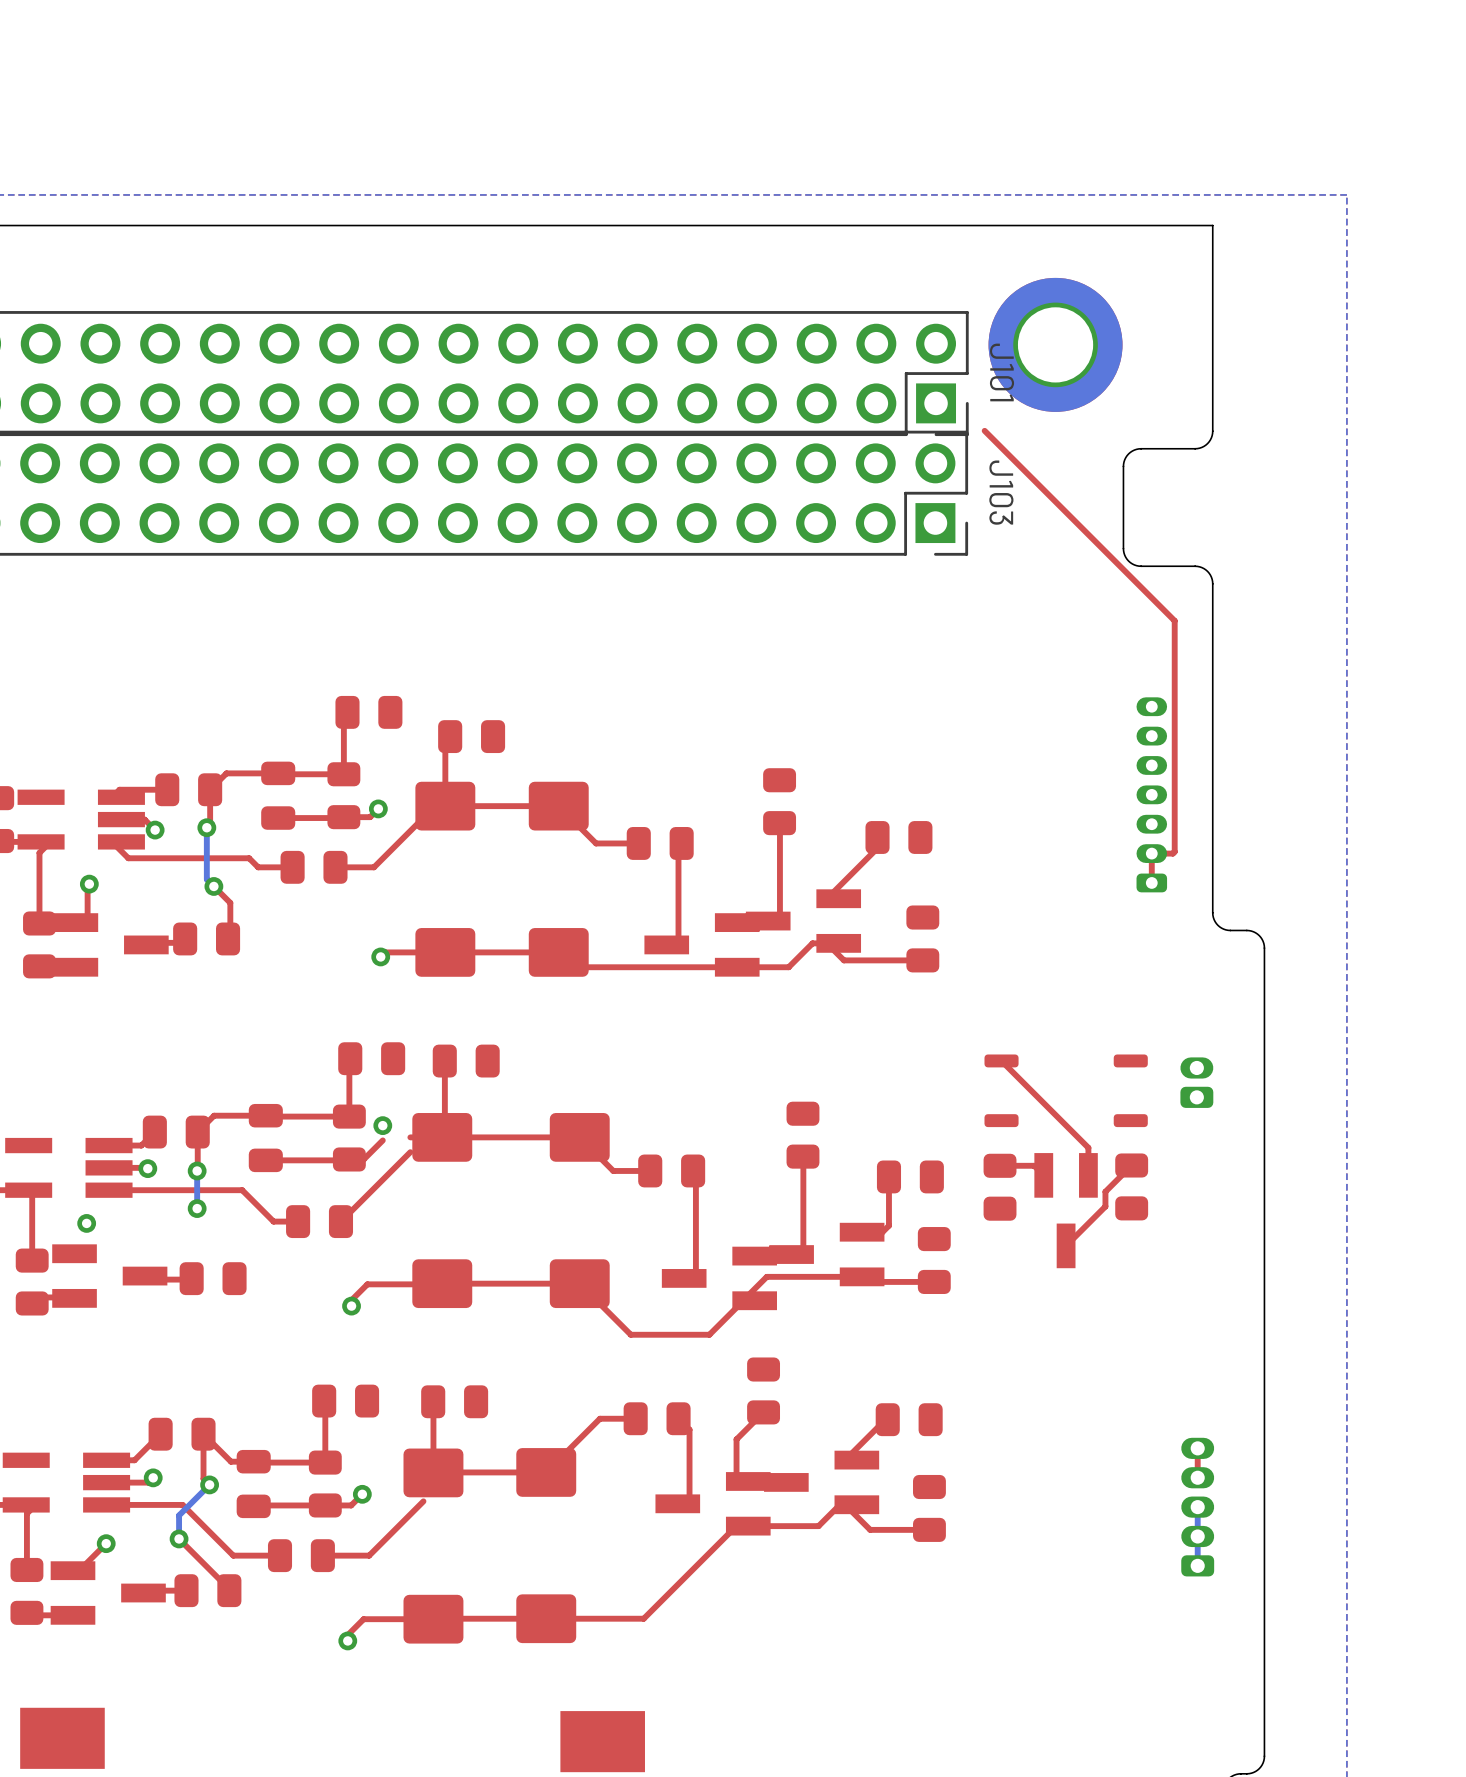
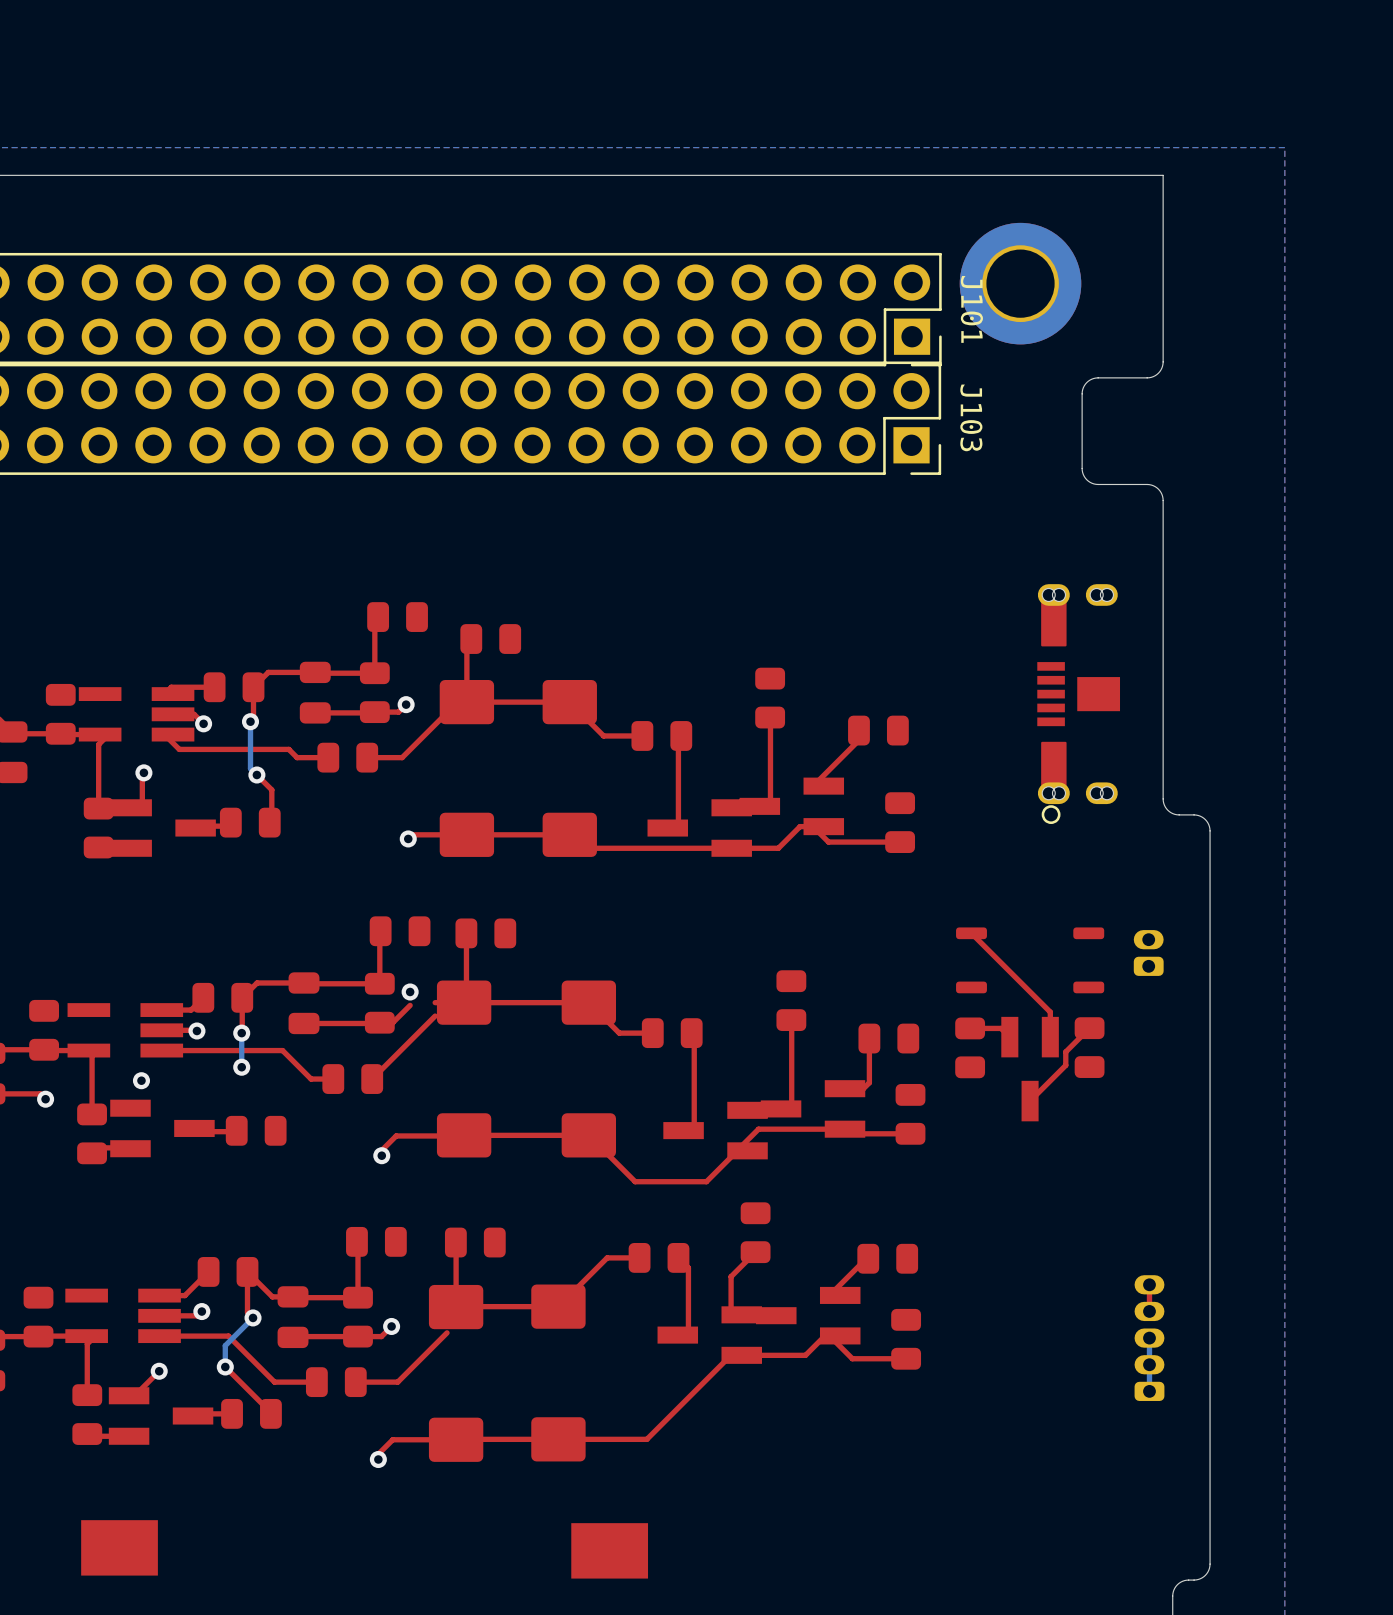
top track: (984, 430) (1174, 620) (1174, 851) (1172, 853) (1151, 853) (1151, 882) -> none
part: (1151, 794) -> none
part: none -> (1078, 704)

